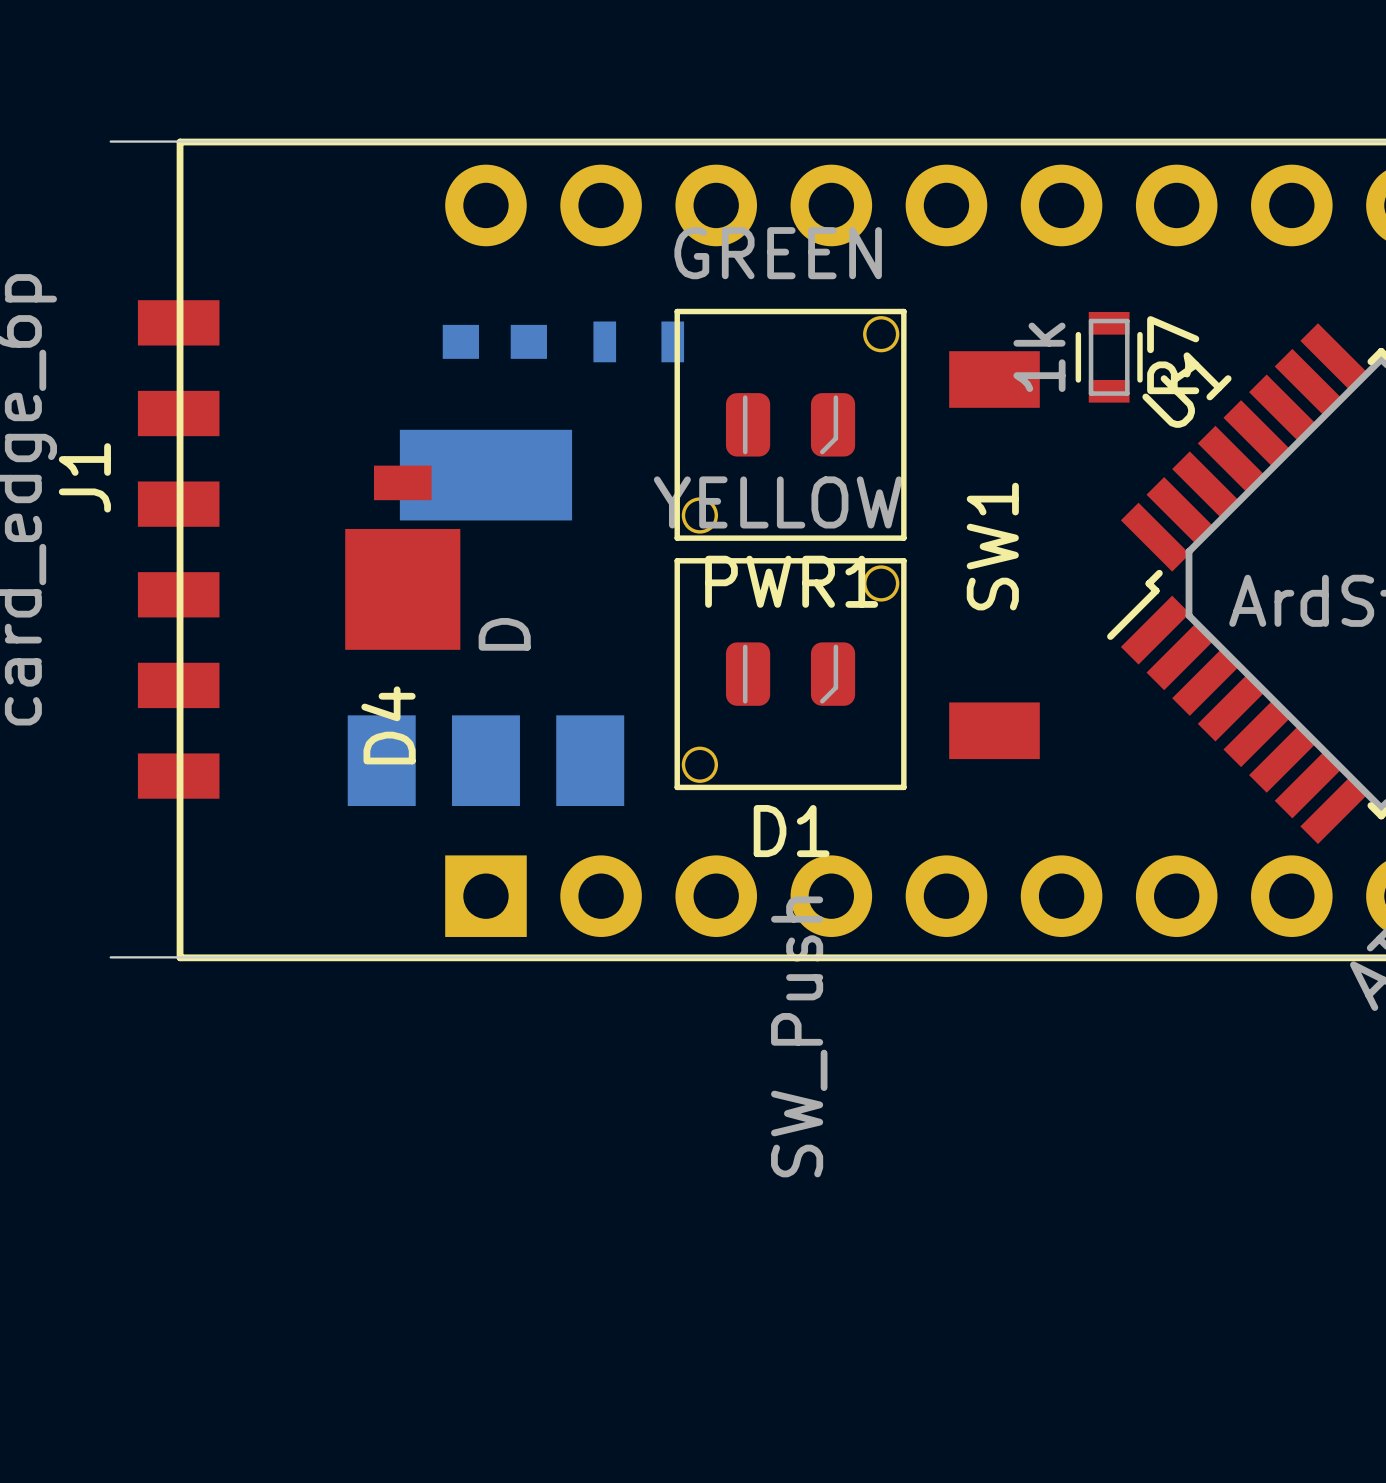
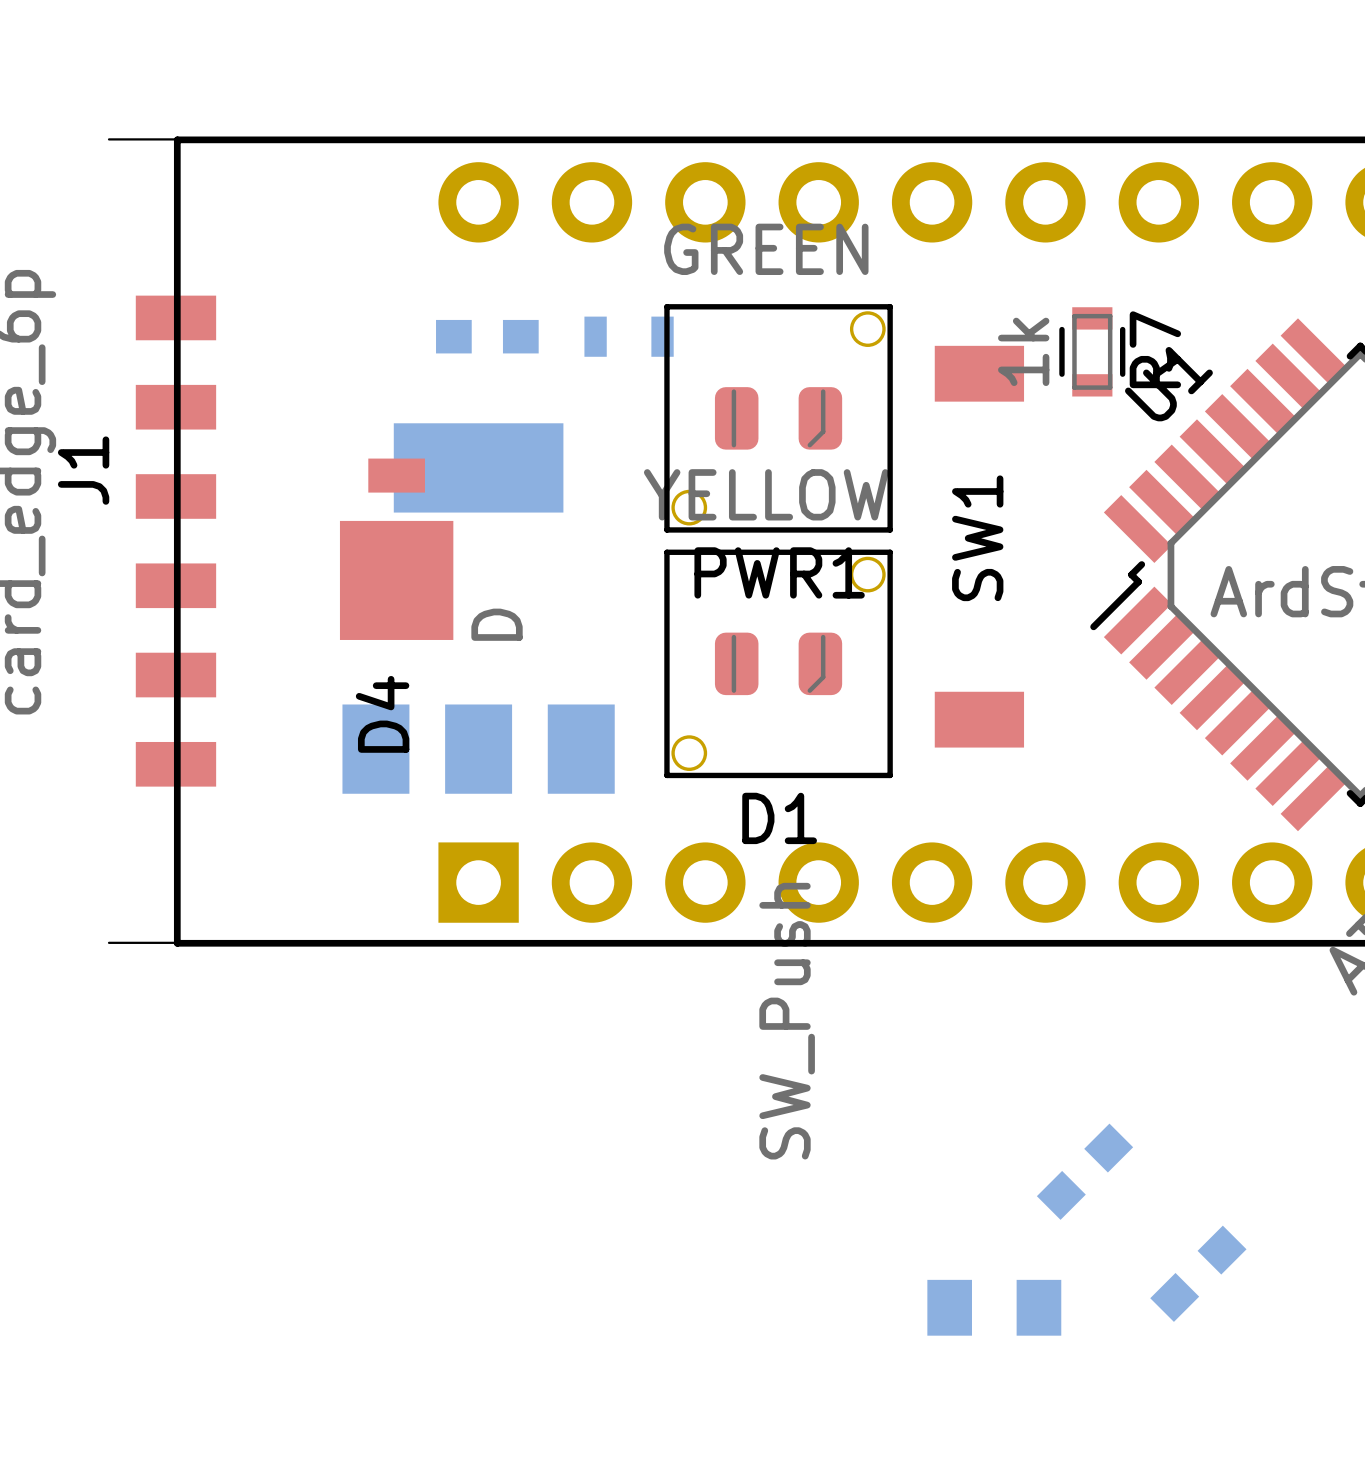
part: none -> (1085, 1171)
part: none -> (1198, 1273)
part: none -> (994, 1307)

